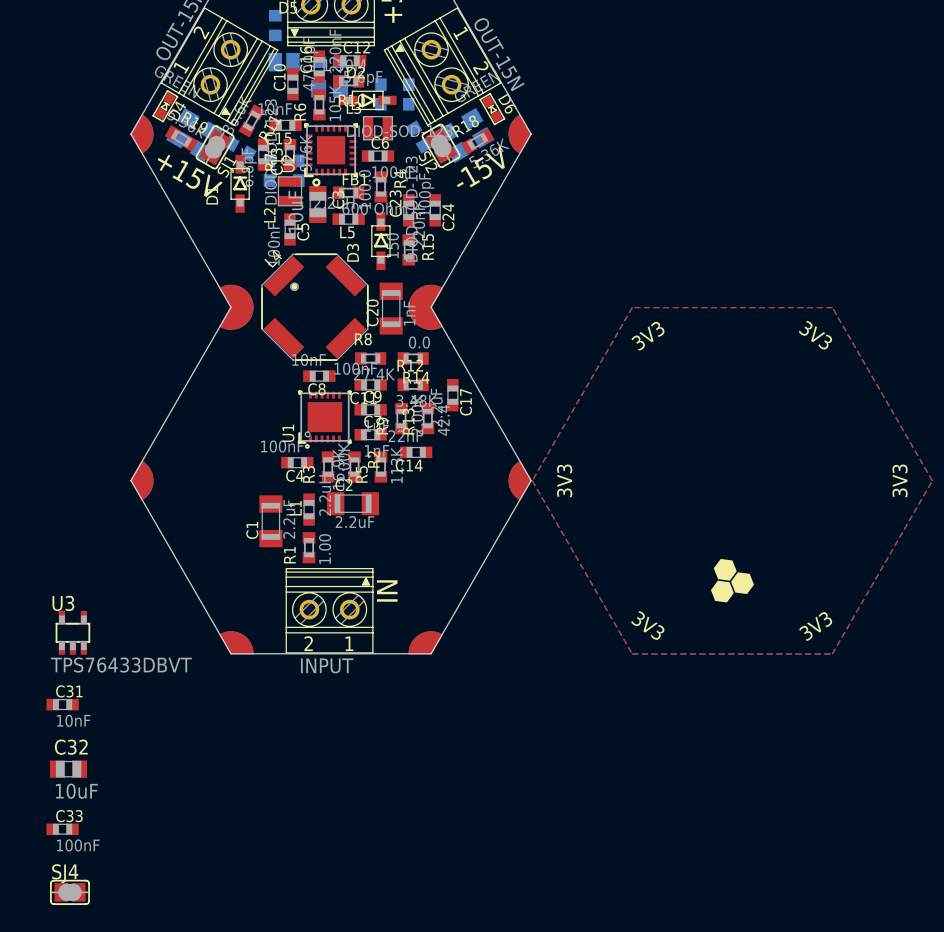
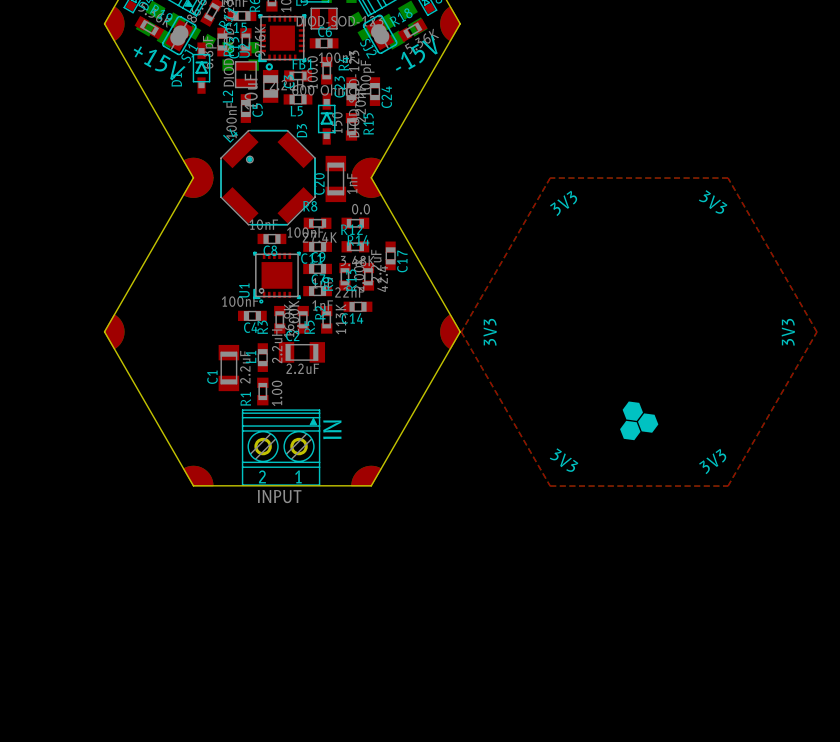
U3: TPS76433DBVT (72, 632) -> none
C31: 10nF (62, 704) -> none
C32: 10uF (68, 769) -> none
C33: 100nF (62, 829) -> none
SJ4: (69, 892) -> none

